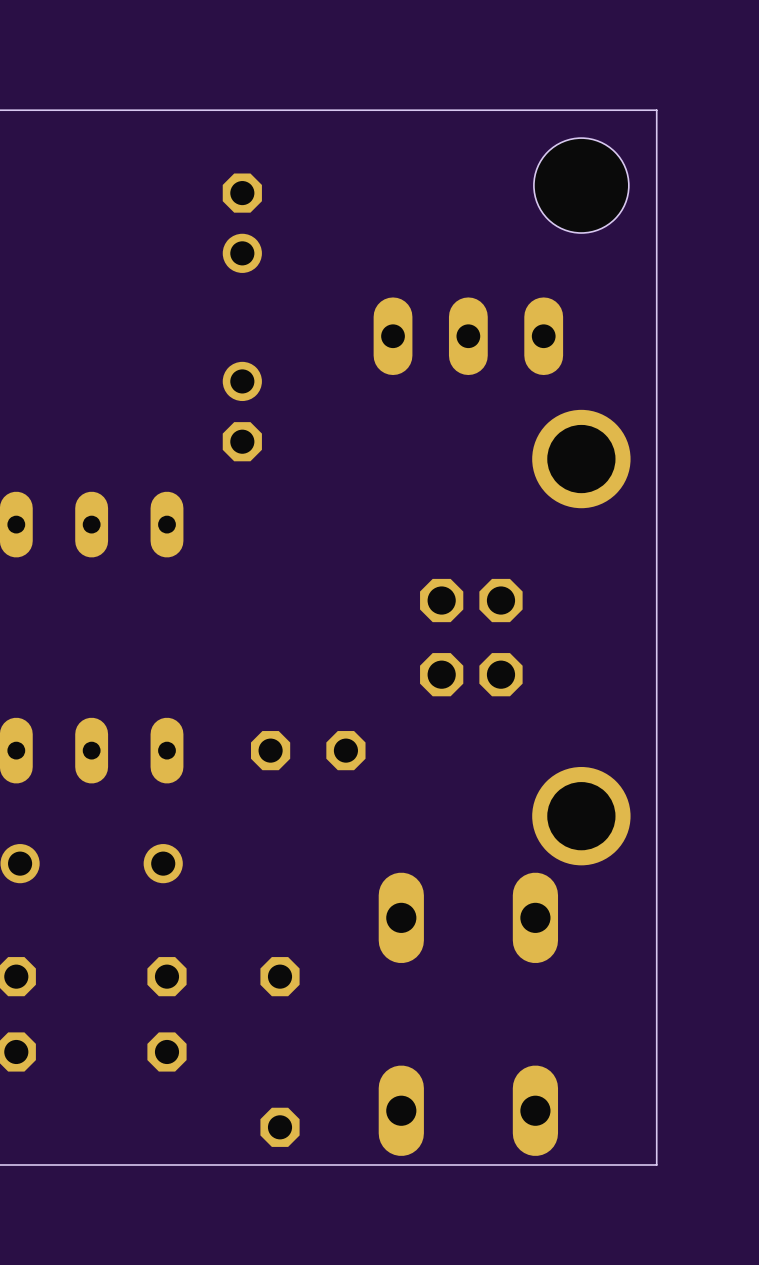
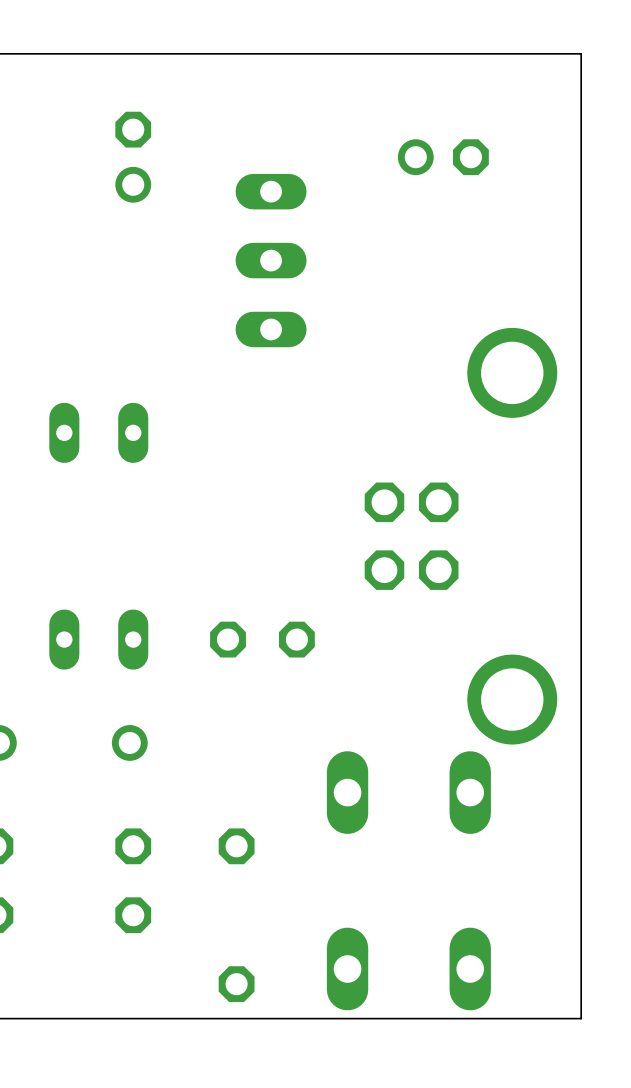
hole: (581, 185) -> none
part position: (242, 223) -> (133, 157)
part: none -> (443, 157)
part rotation: 0° (468, 336) -> 90° clockwise (271, 260)
part position: (468, 336) -> (271, 260)
part: (242, 411) -> none

